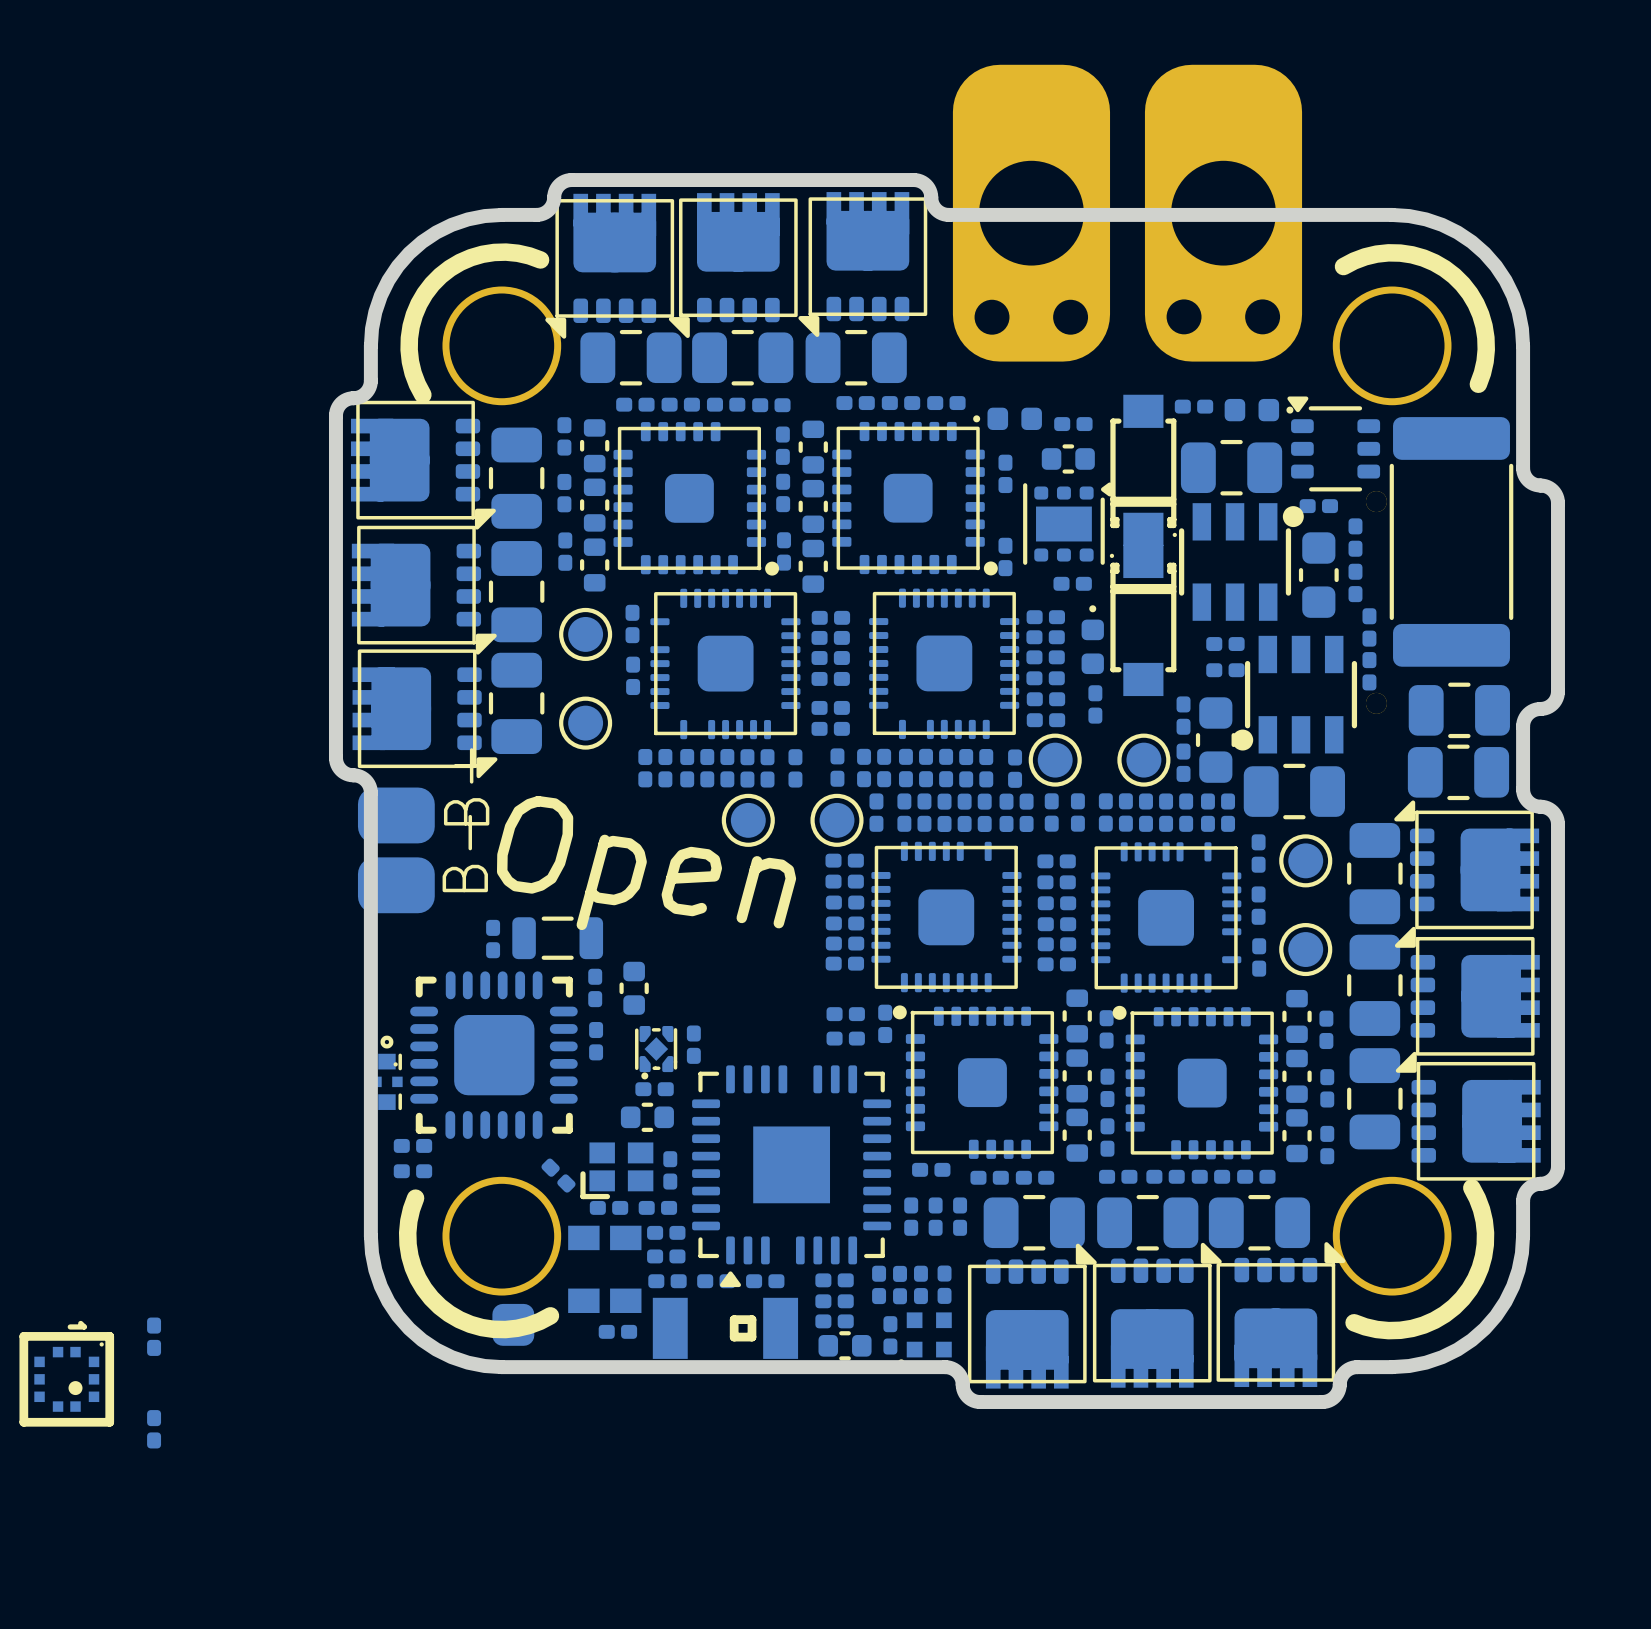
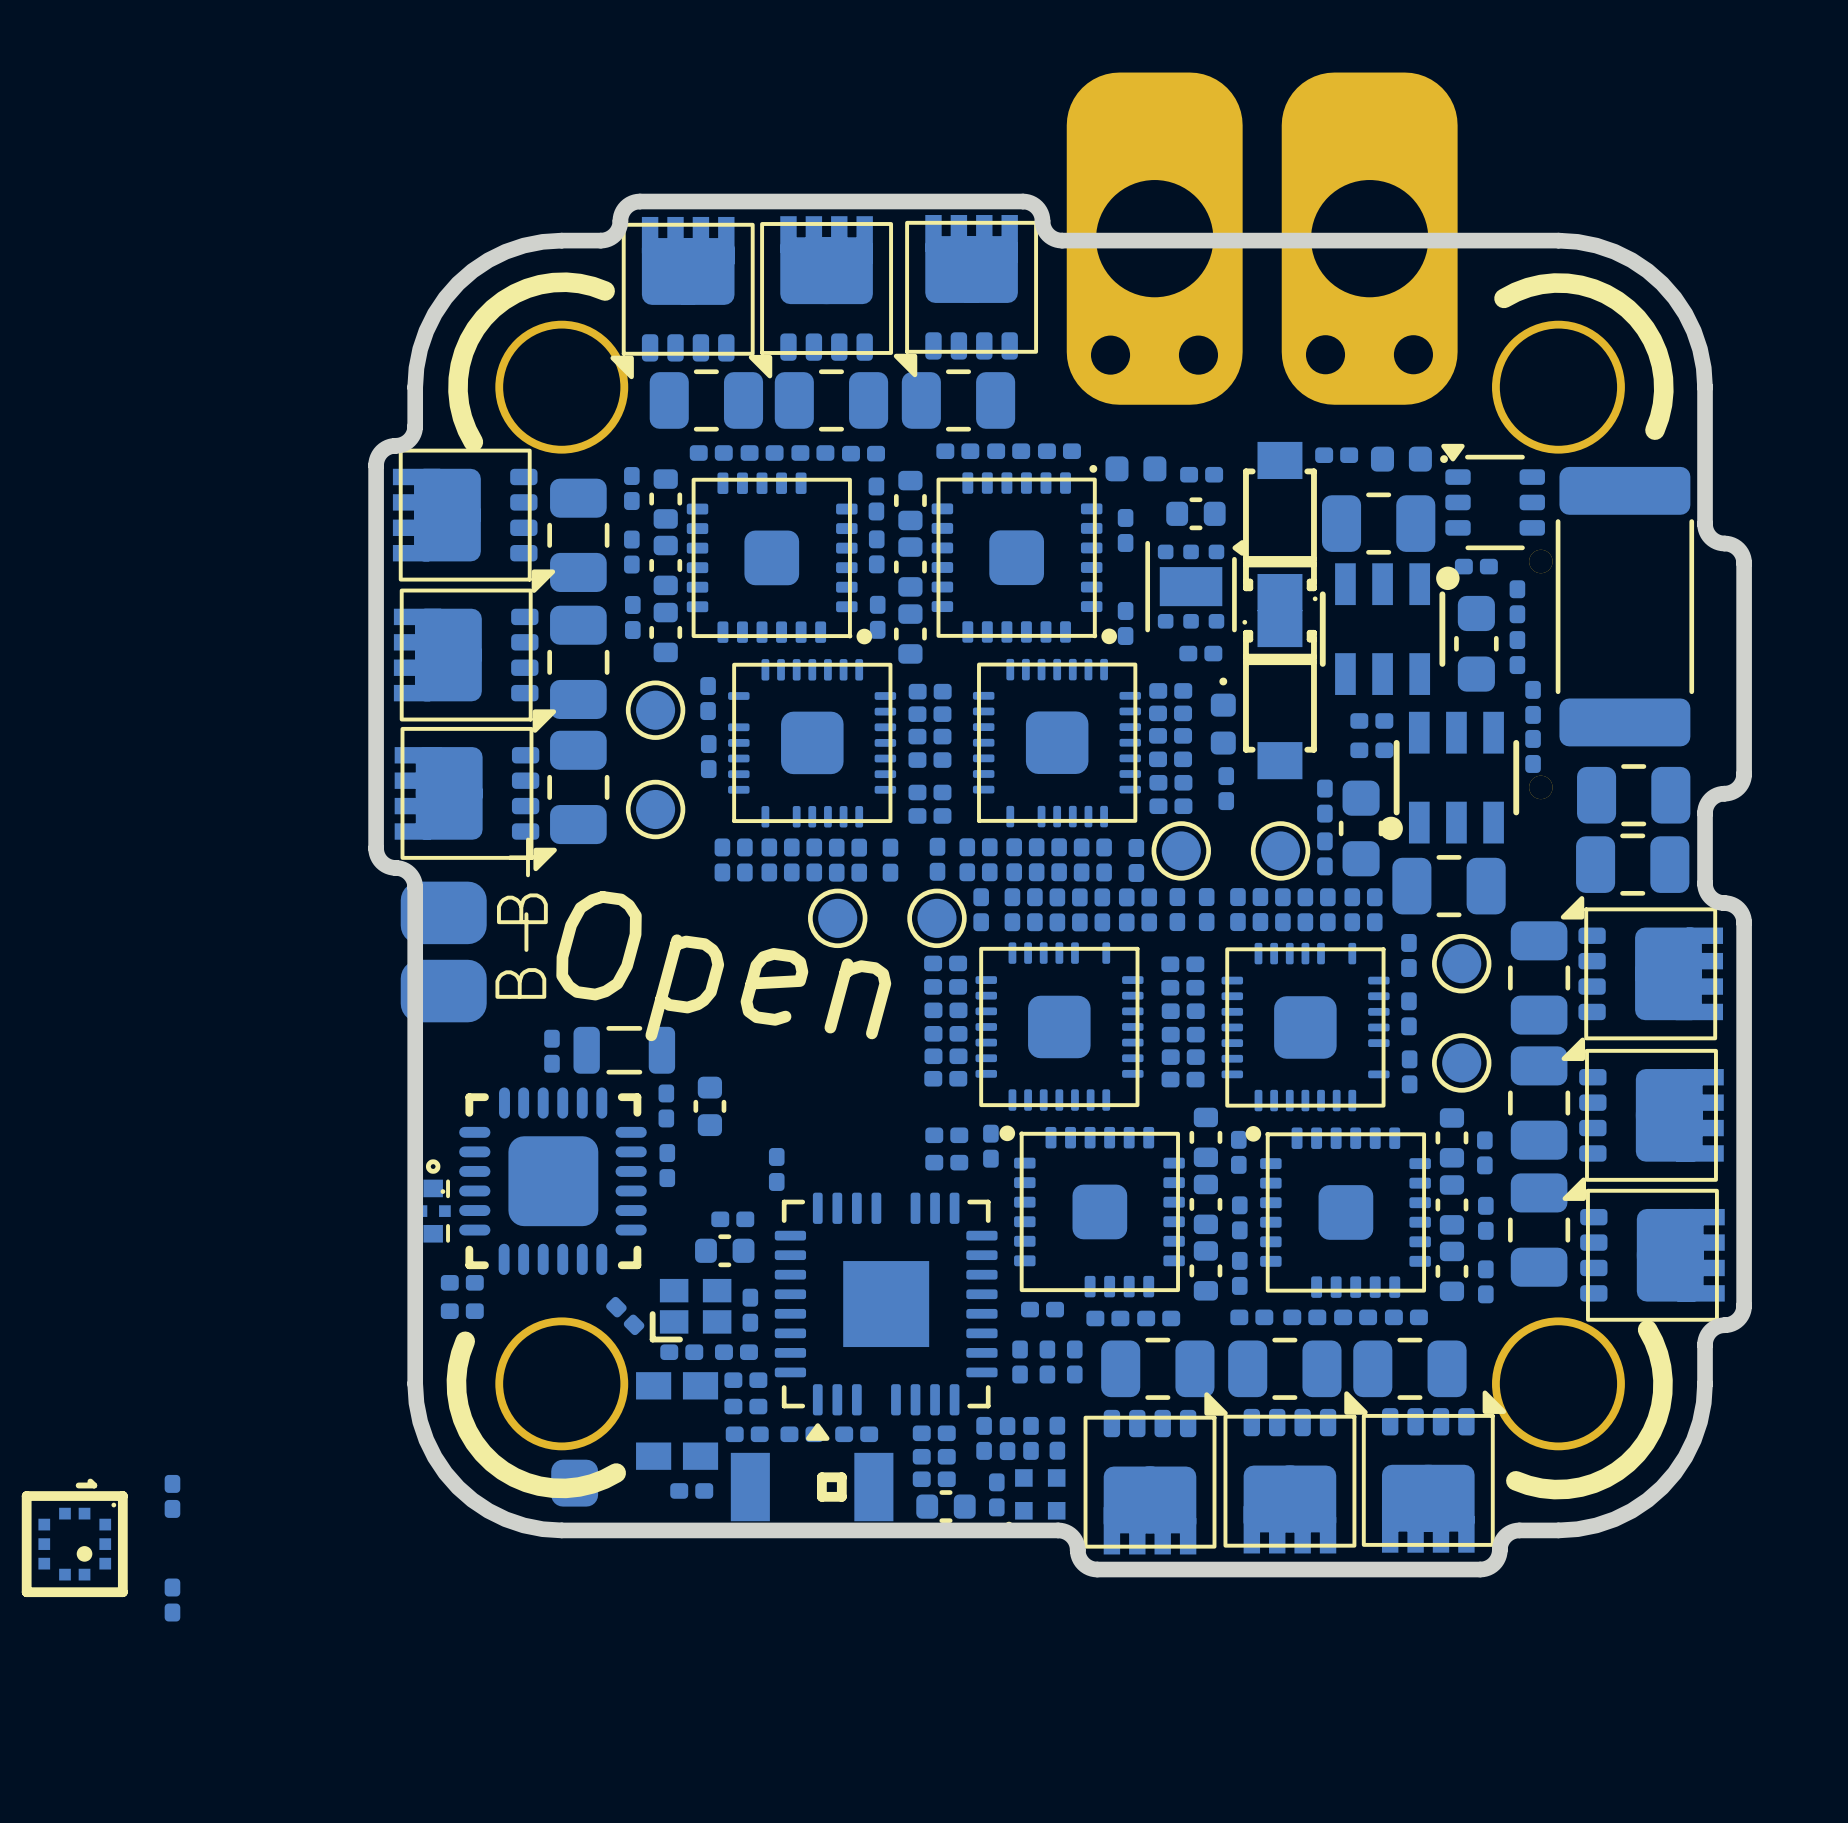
part: (656, 1052) -> none

